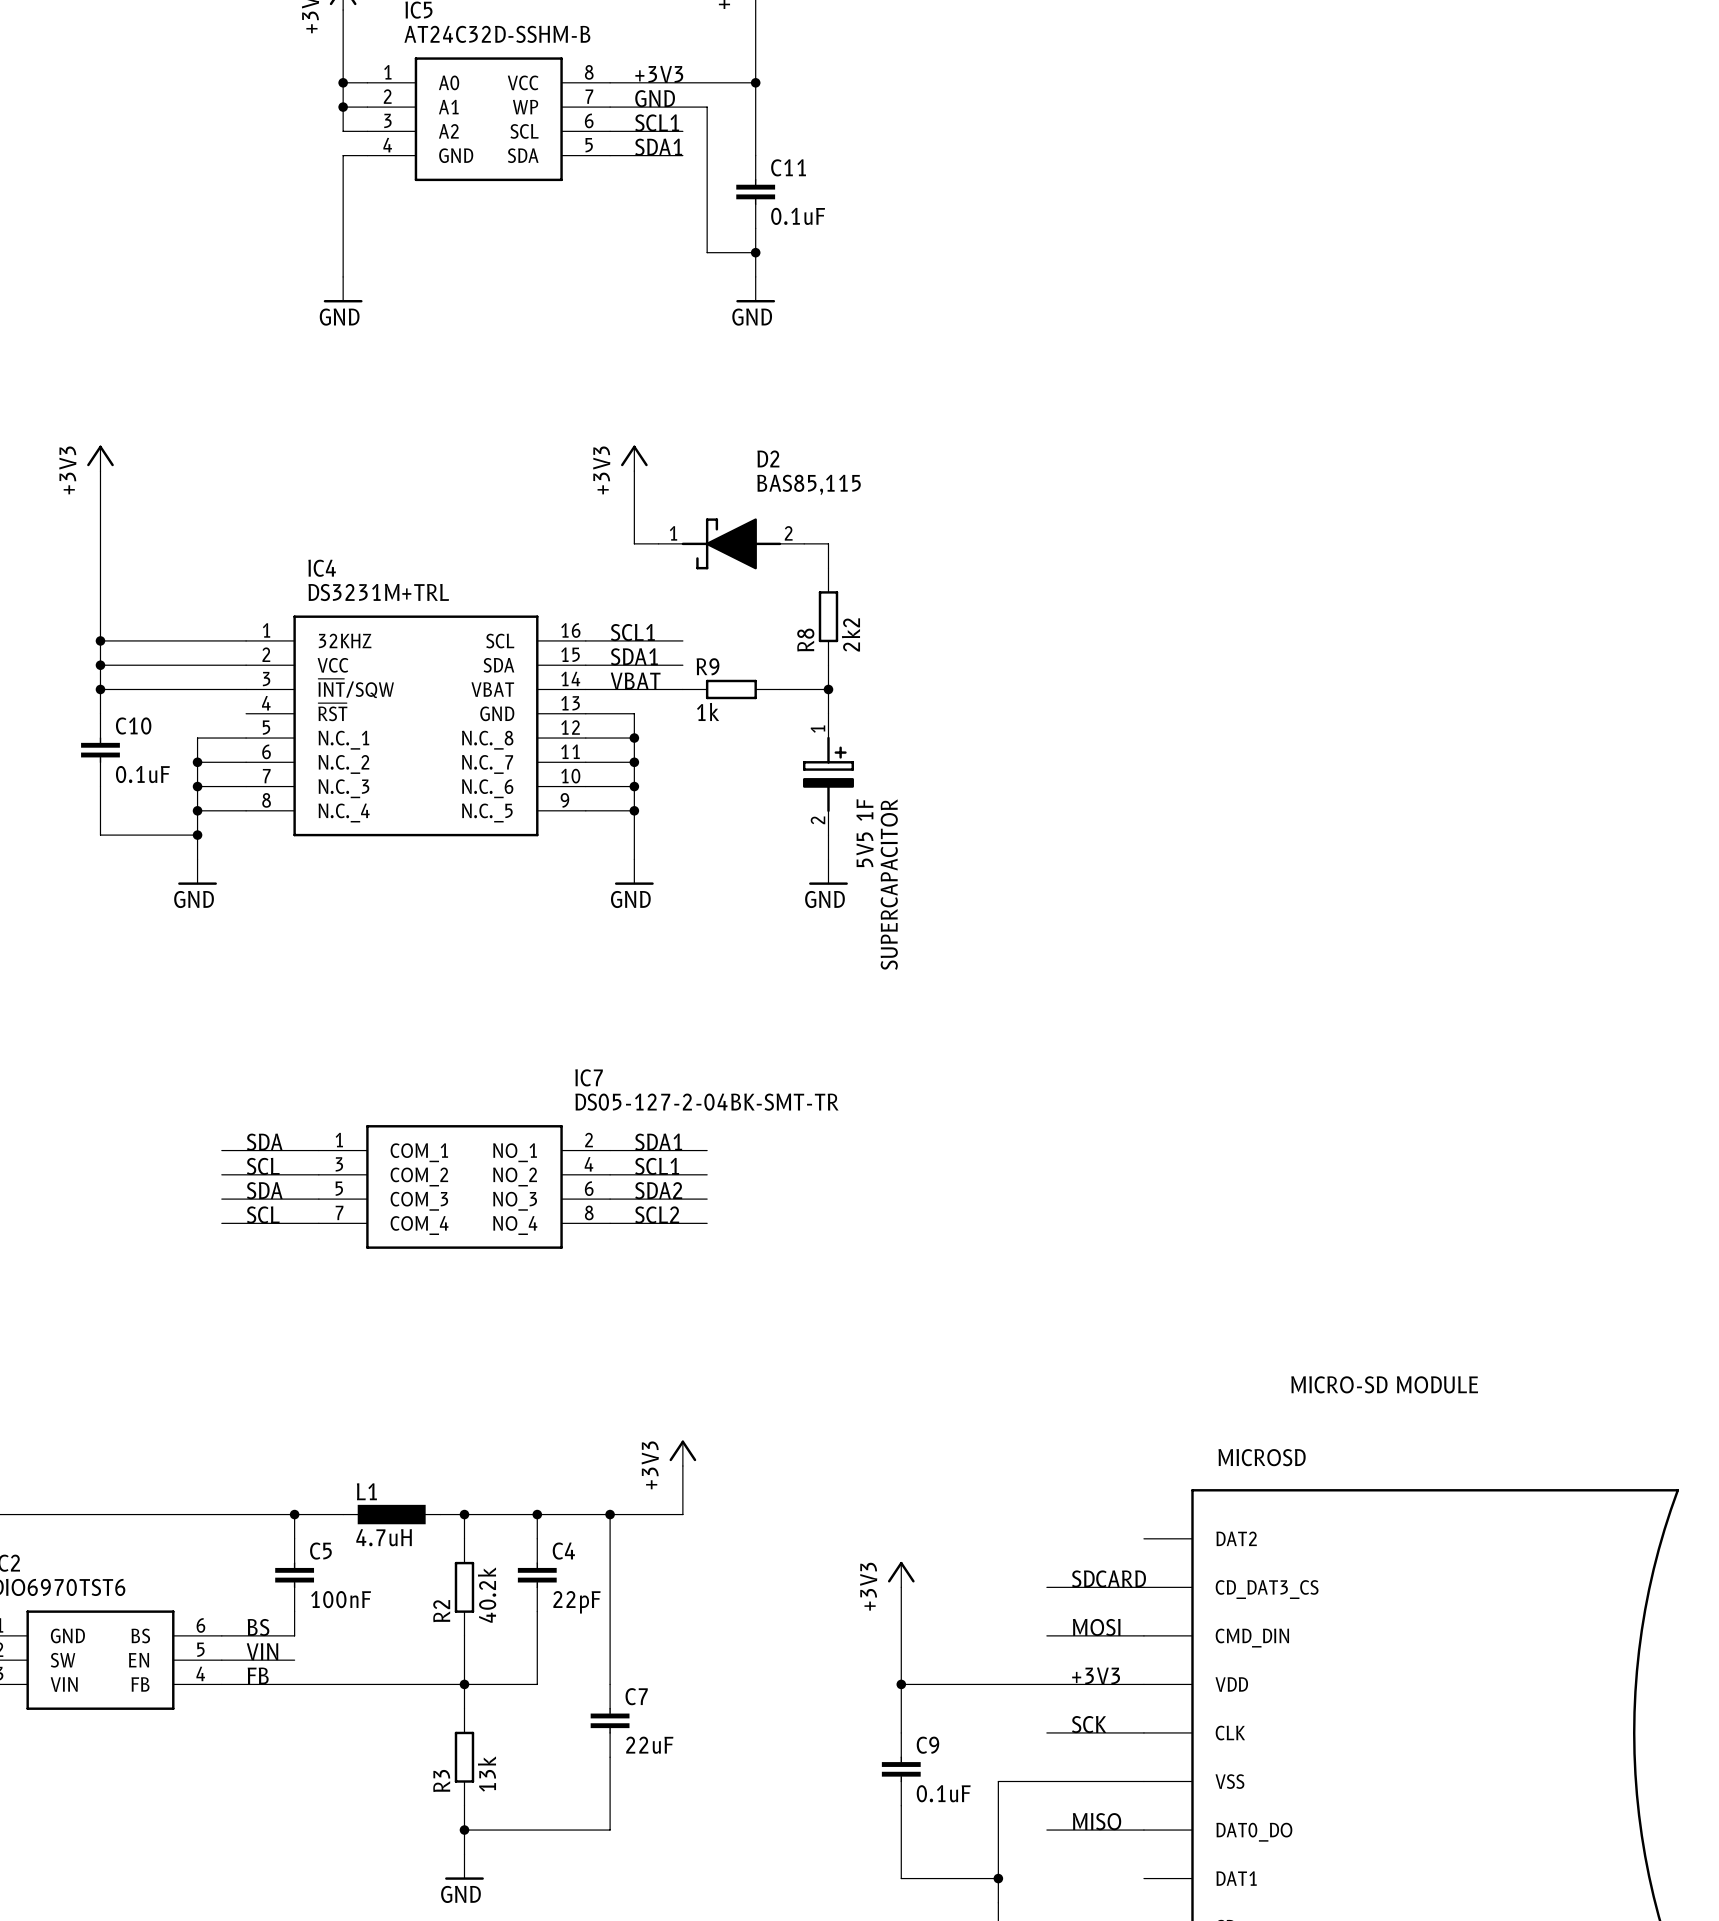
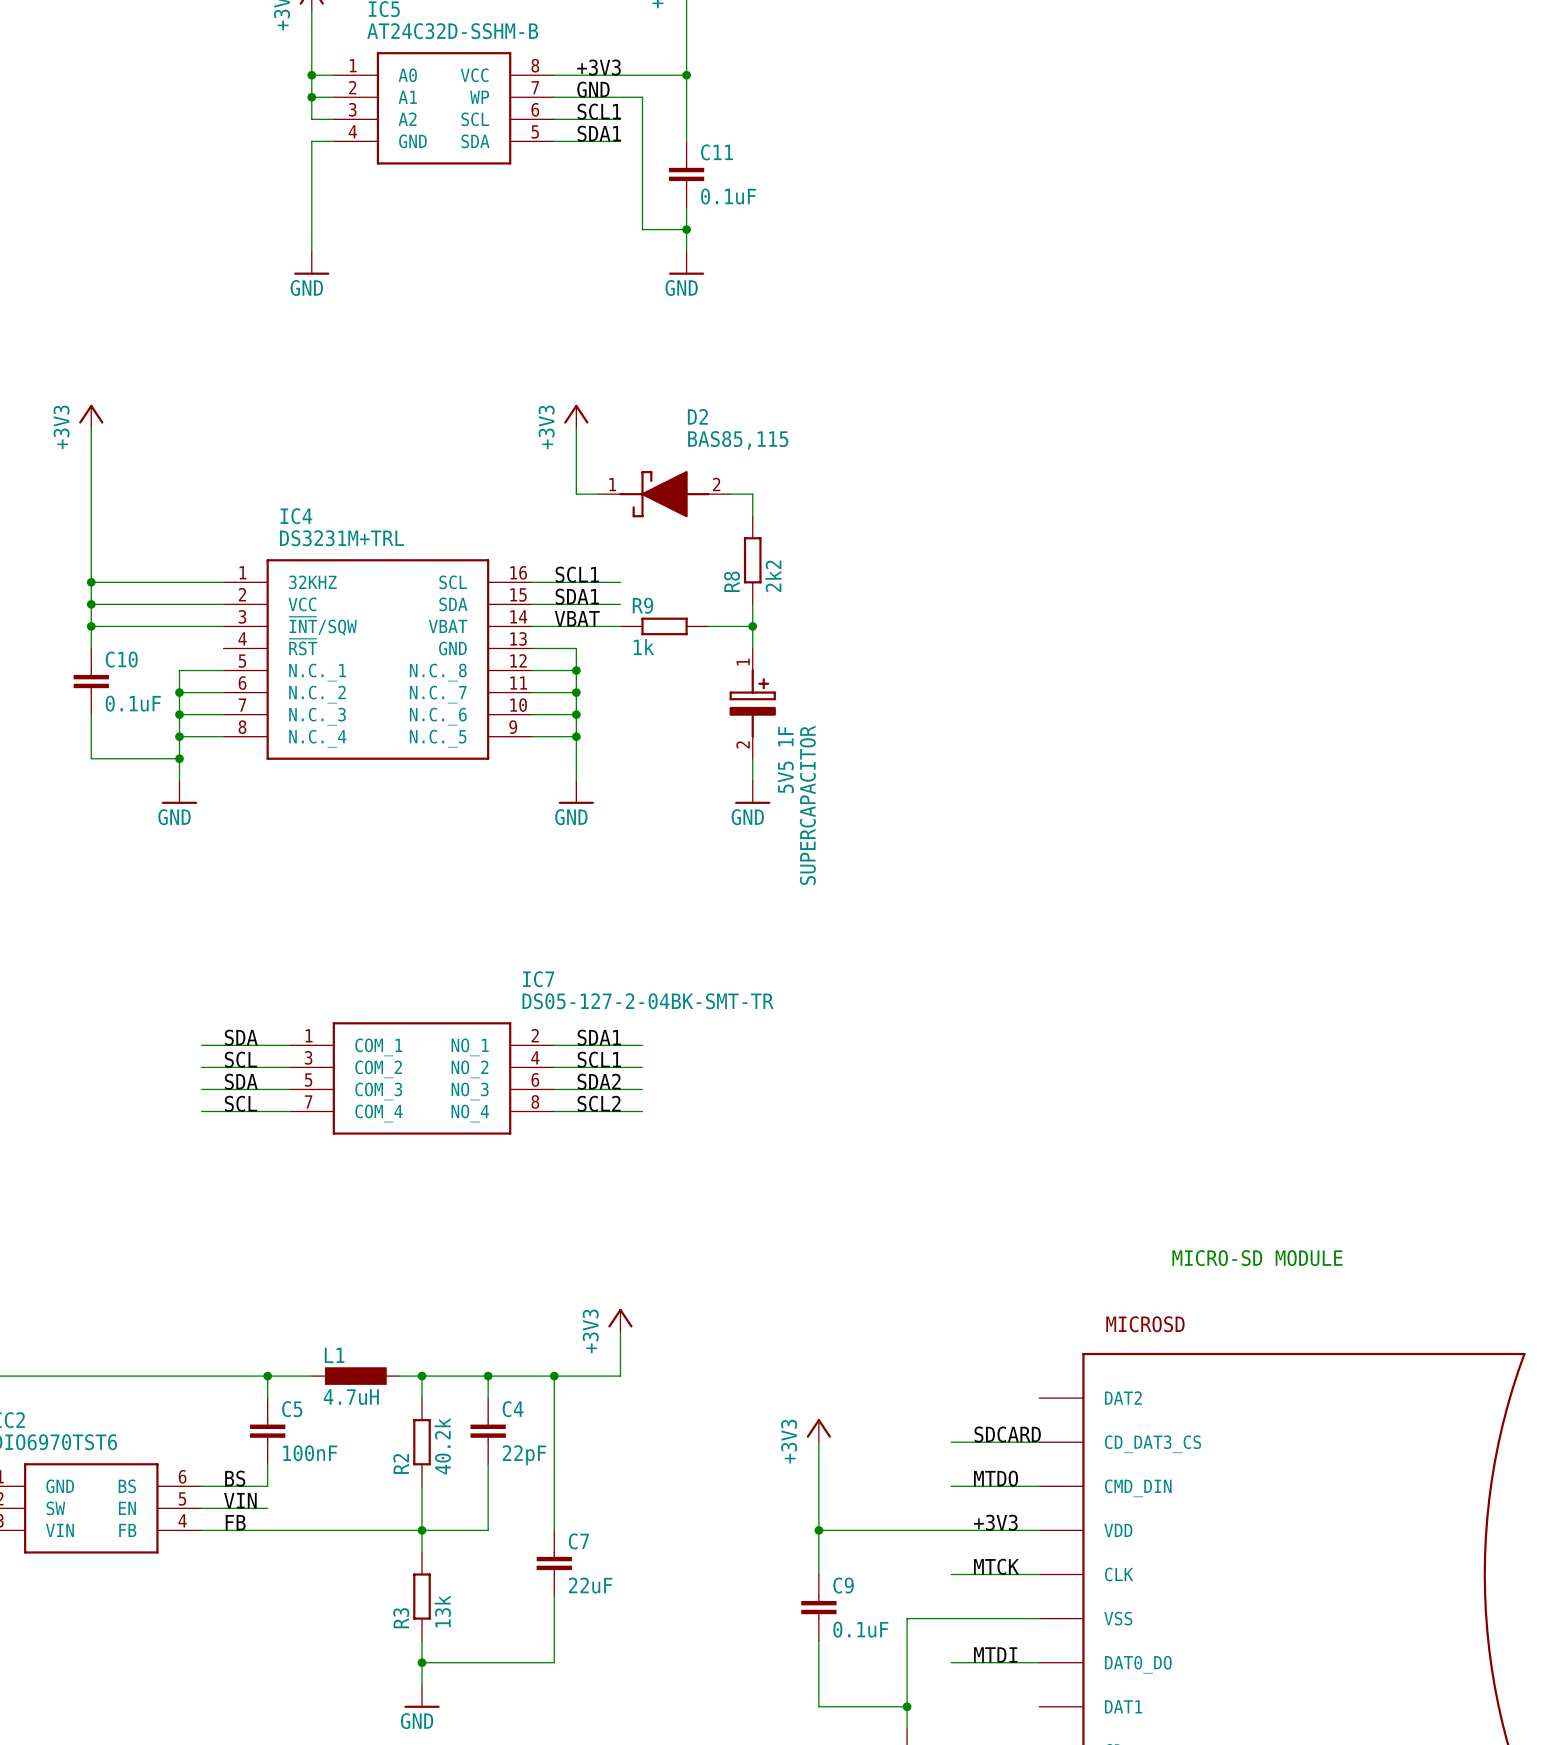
label: MOSI (1096, 1627) -> MTDO (996, 1478)
label: SCK (1089, 1724) -> MTCK (996, 1566)
label: MISO (1097, 1821) -> MTDI (995, 1654)

